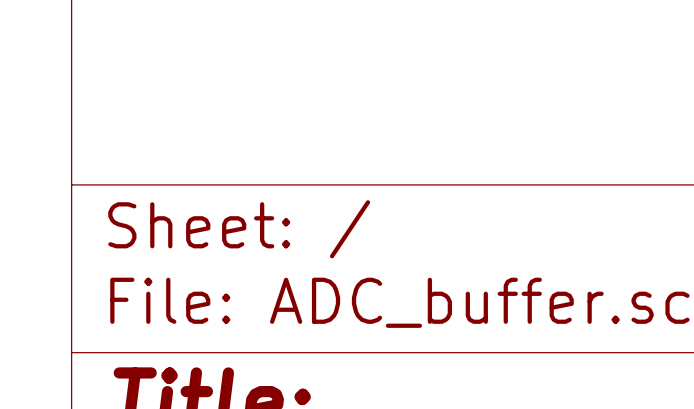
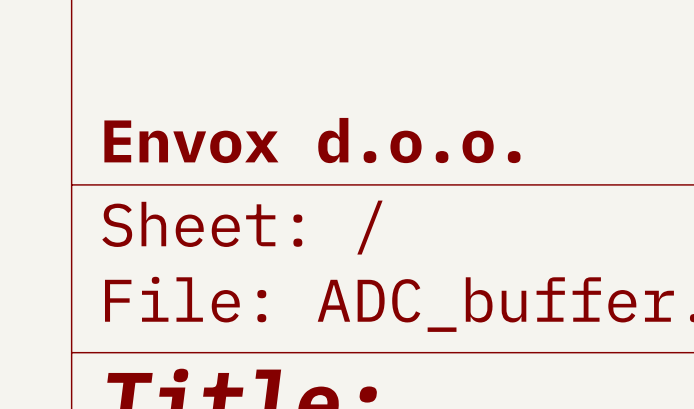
title block: none -> Envox d.o.o. (312, 140)

